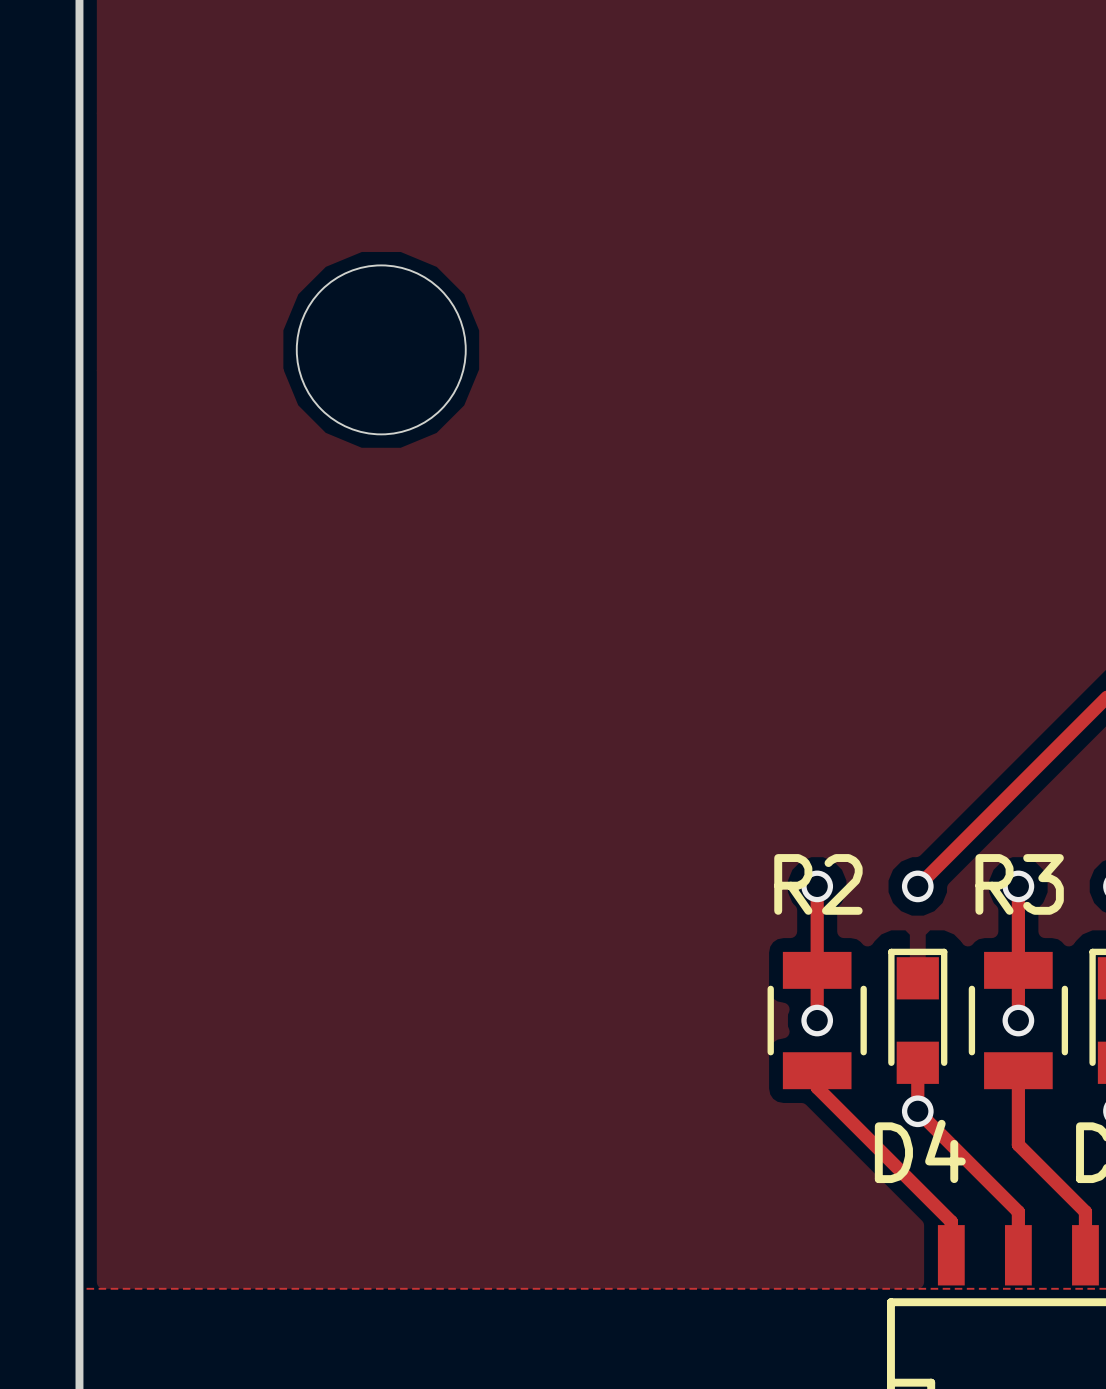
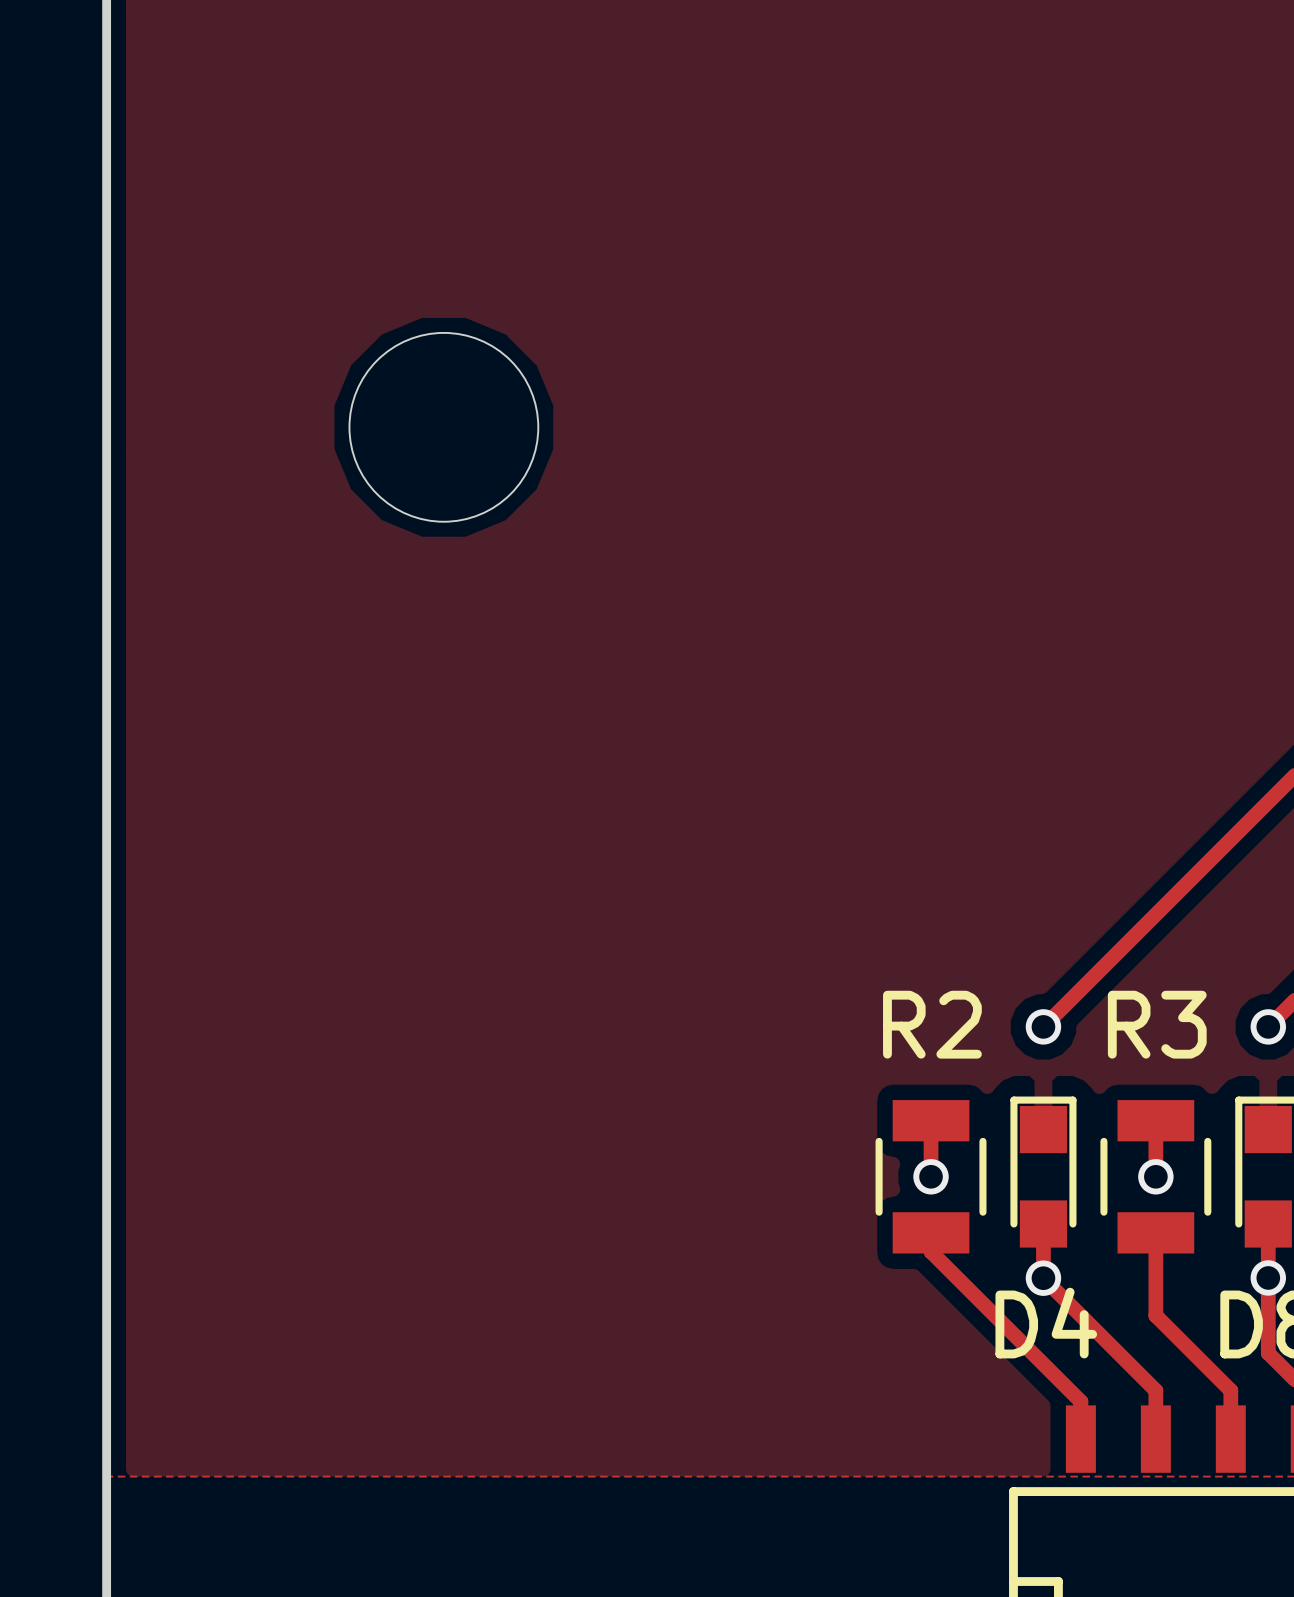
track: (817, 886) (817, 970) -> none
via: (817, 886) -> none
track: (1018, 886) (1018, 970) -> none
via: (1018, 886) -> none

